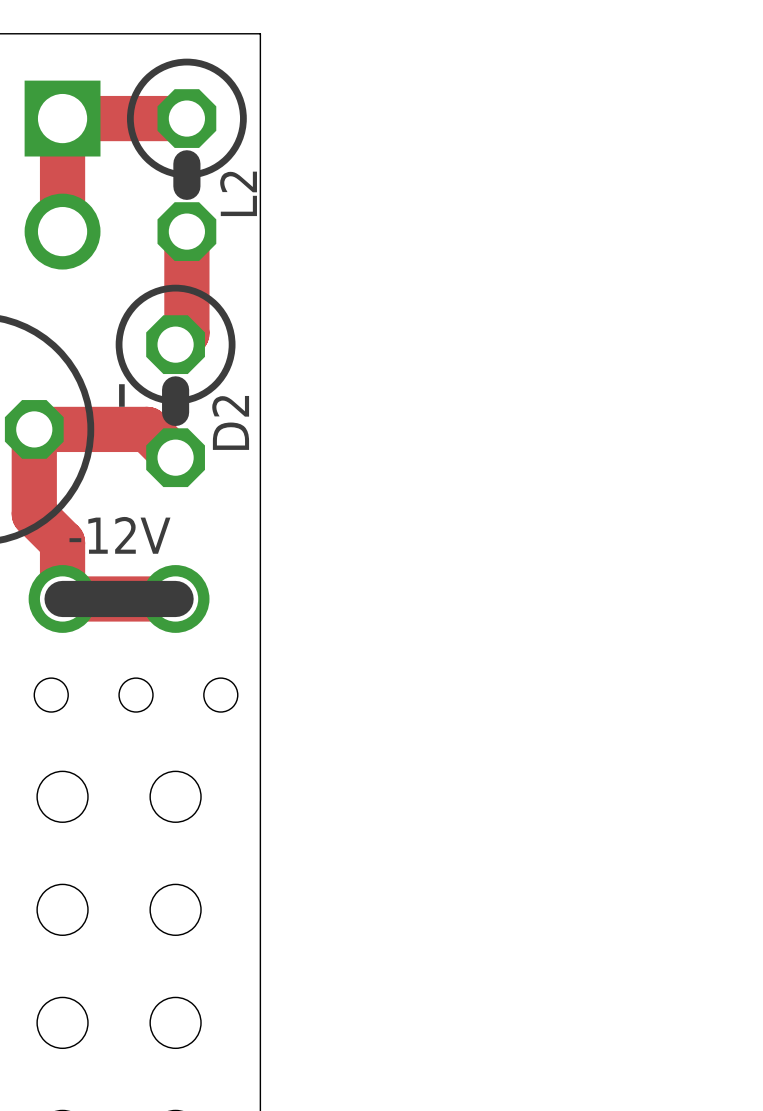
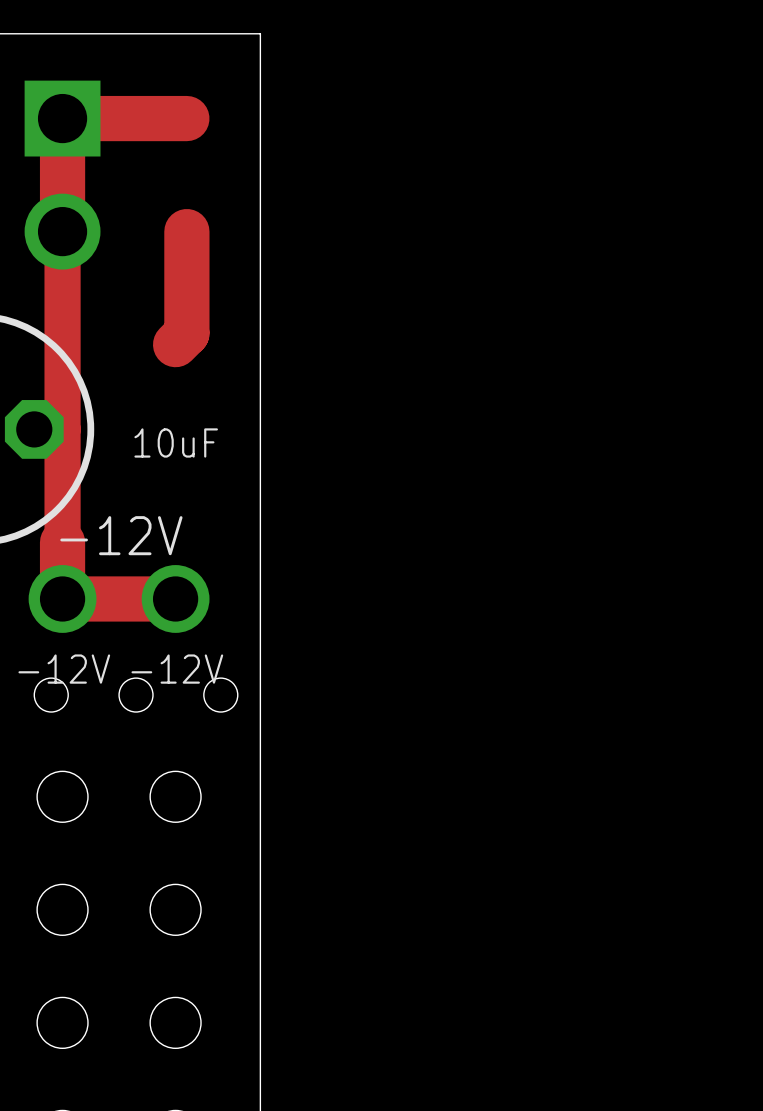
L2: (186, 159) -> none
D2: (175, 385) -> none
text: none -> 10uF (176, 442)
track: (175, 457) (147, 429) (34, 429) (34, 514) (62, 542) -> (62, 231) (62, 542)
line: (62, 598) (175, 598) -> none
text: none -> -12V (64, 669)
text: none -> -12V (177, 669)

